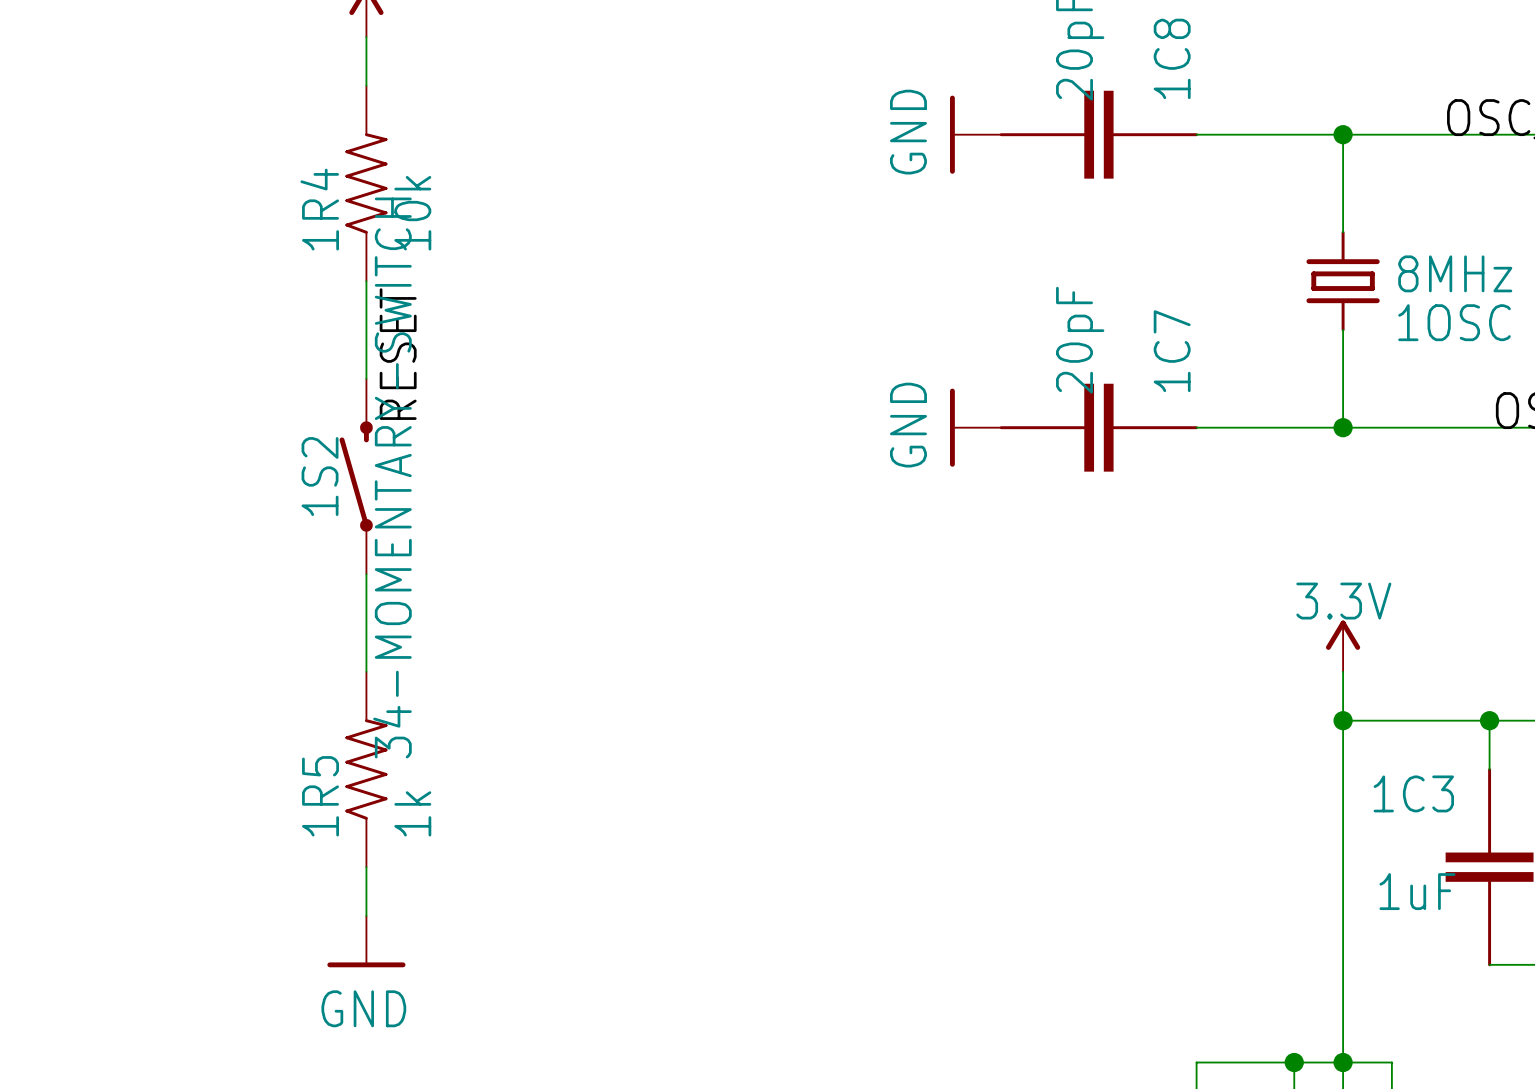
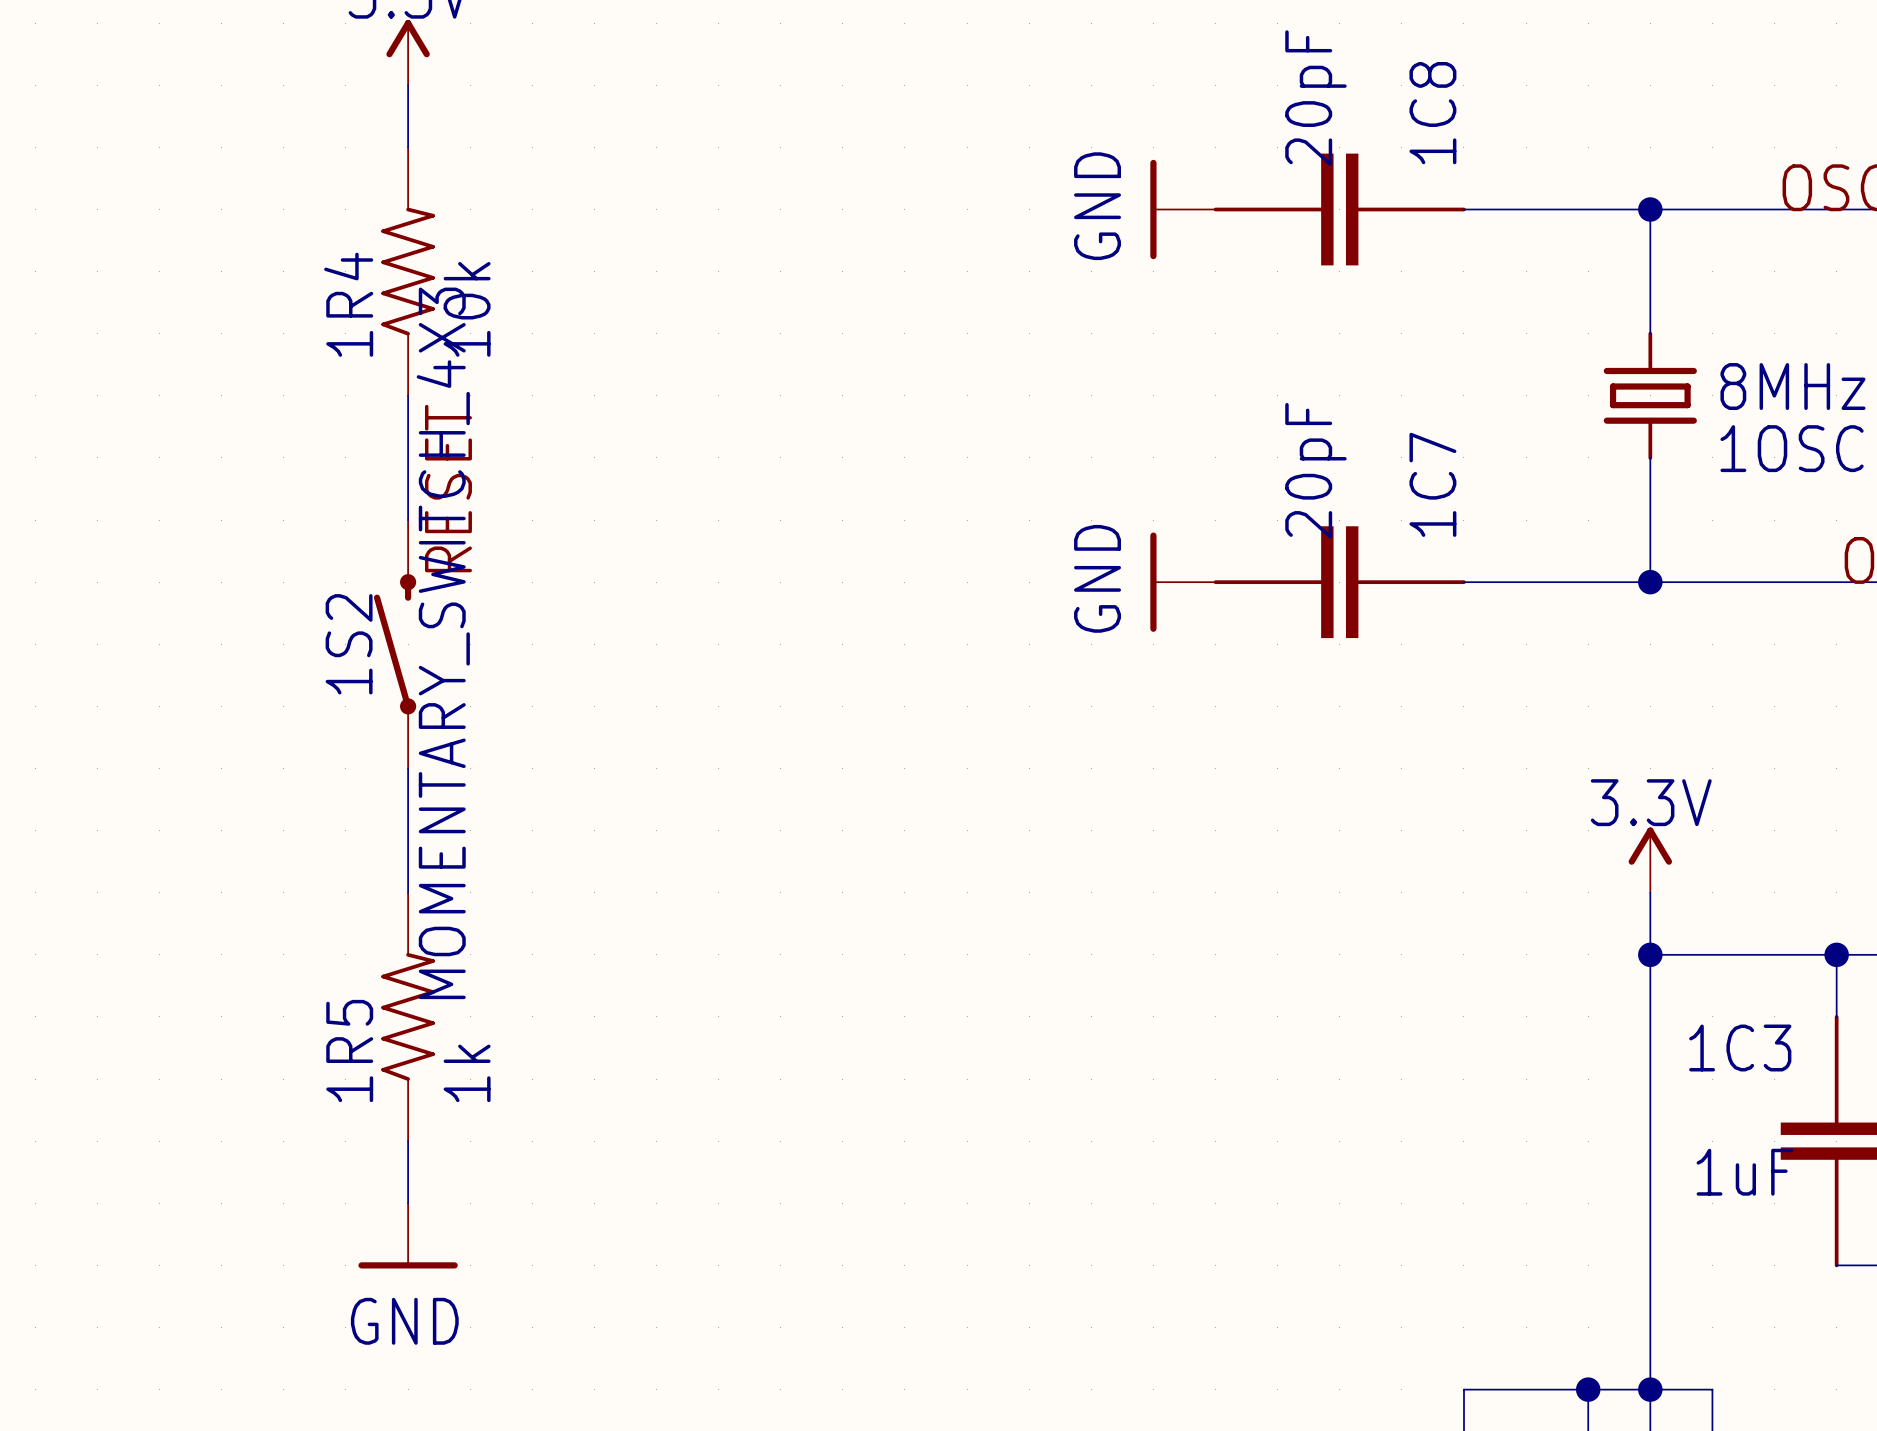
1S2 value: 34-MOMENTARY-SWITCH (392, 477) -> MOMENTARY_SWITCH_4X3 (443, 643)

